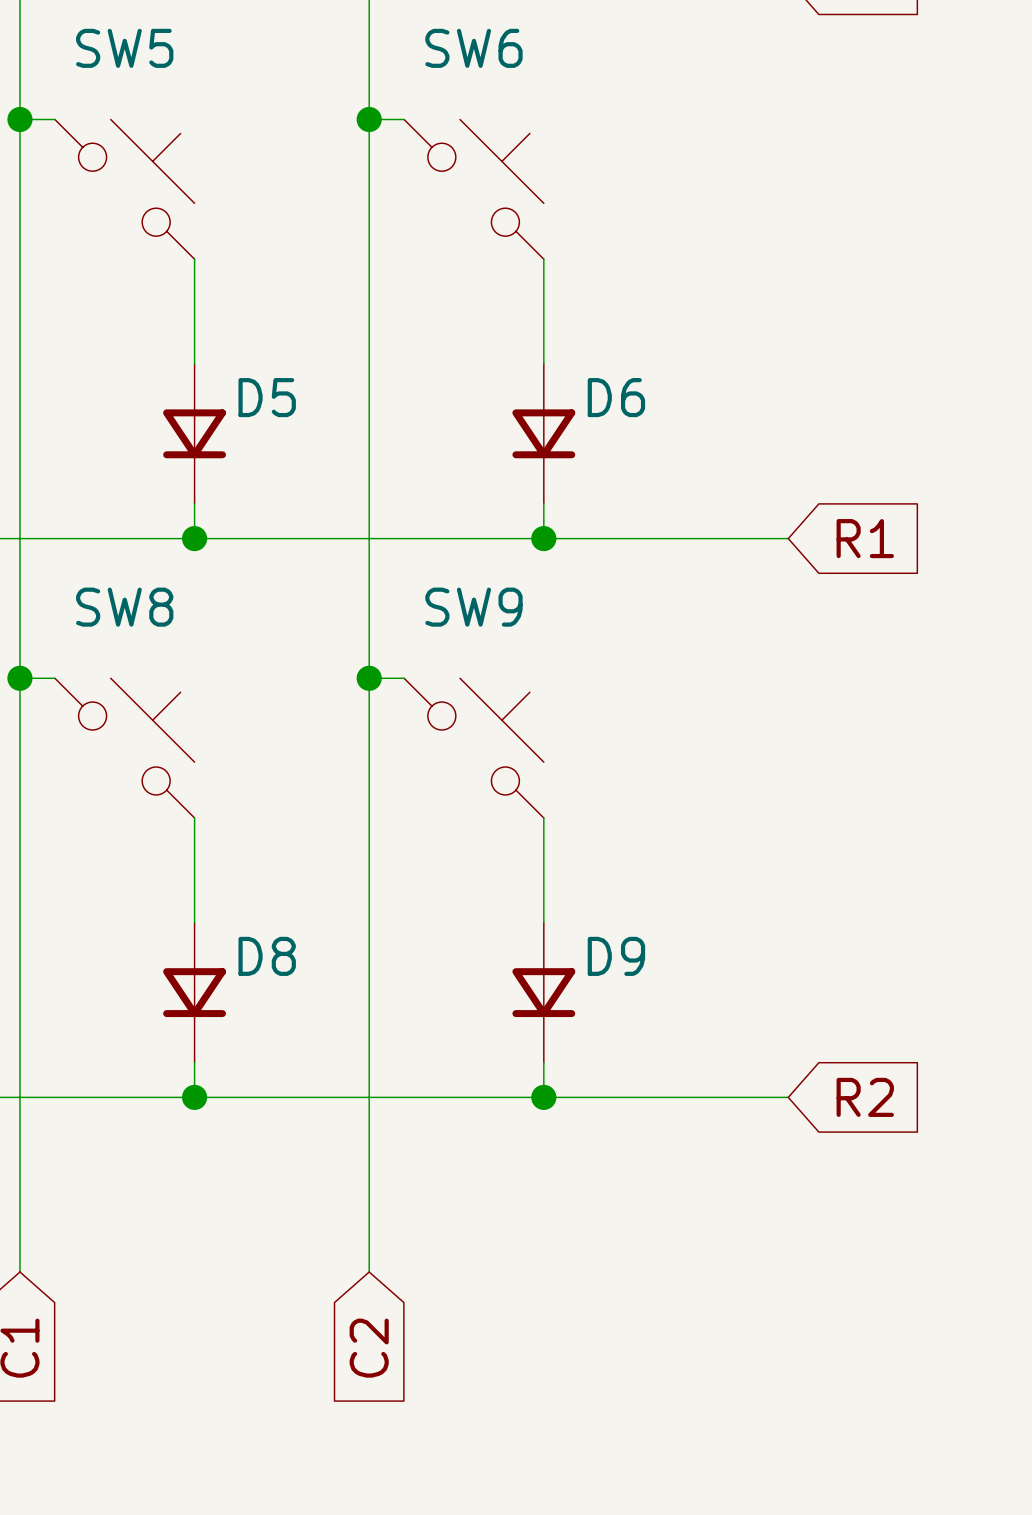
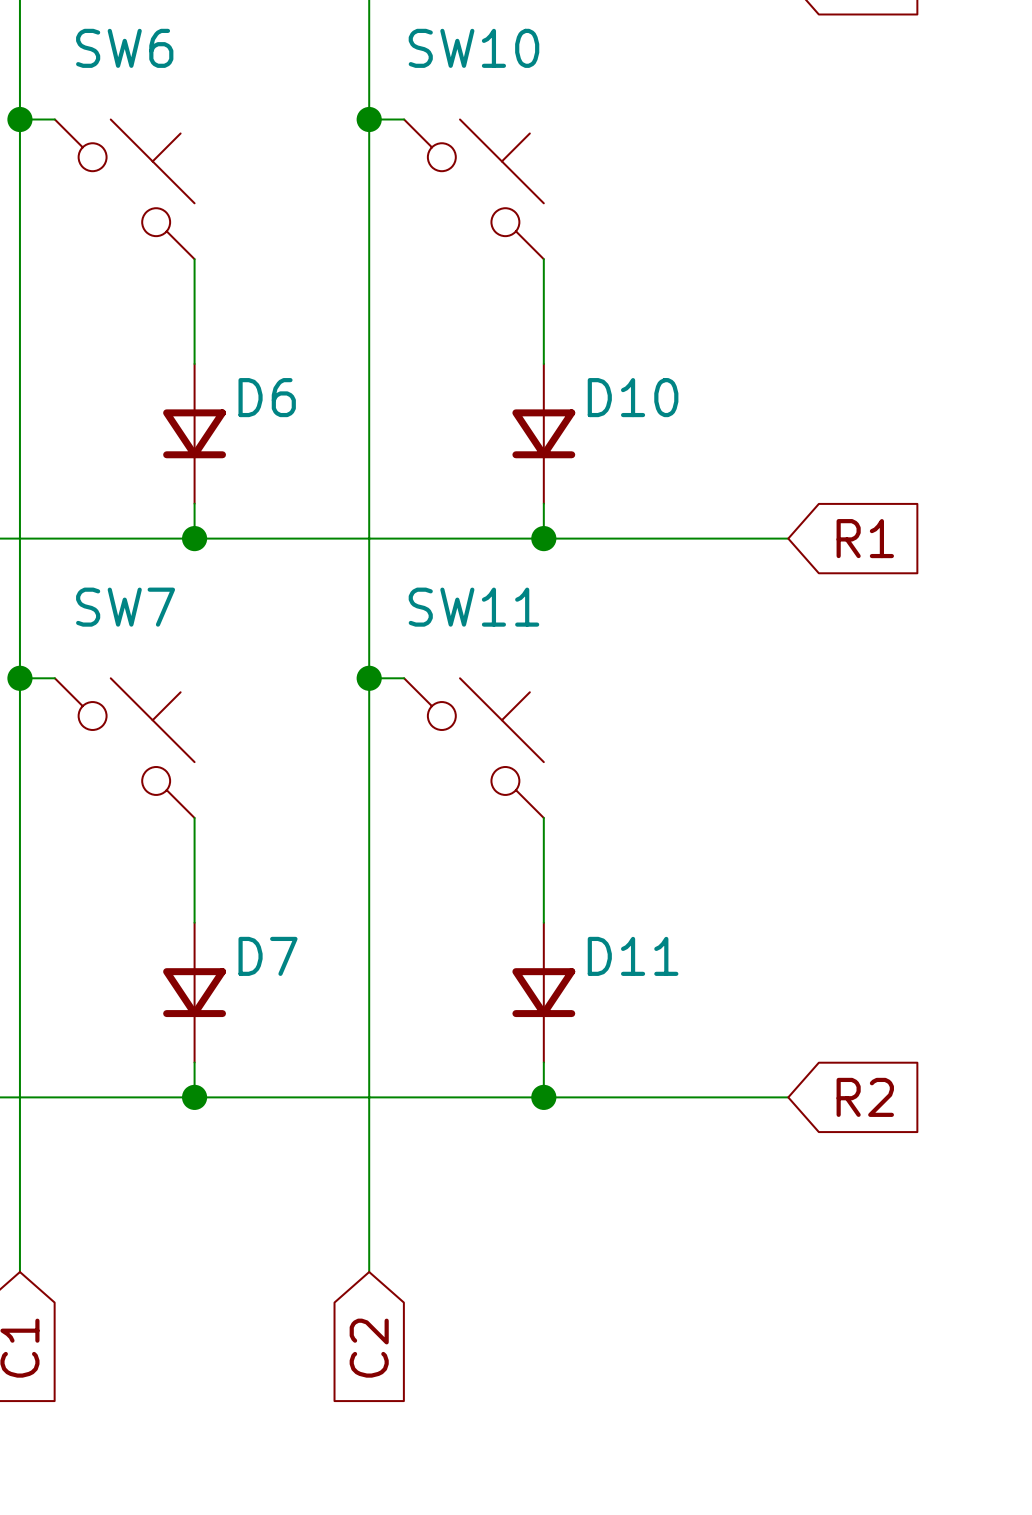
SW5 name: SW5 (124, 48) -> SW6 (124, 48)
SW6 name: SW6 (473, 48) -> SW10 (473, 48)
D5 name: D5 (267, 397) -> D6 (267, 397)
D6 name: D6 (616, 397) -> D10 (633, 397)
SW8 name: SW8 (124, 607) -> SW7 (125, 607)
SW9 name: SW9 (473, 607) -> SW11 (473, 607)
D8 name: D8 (267, 956) -> D7 (268, 956)
D9 name: D9 (616, 956) -> D11 (633, 956)

